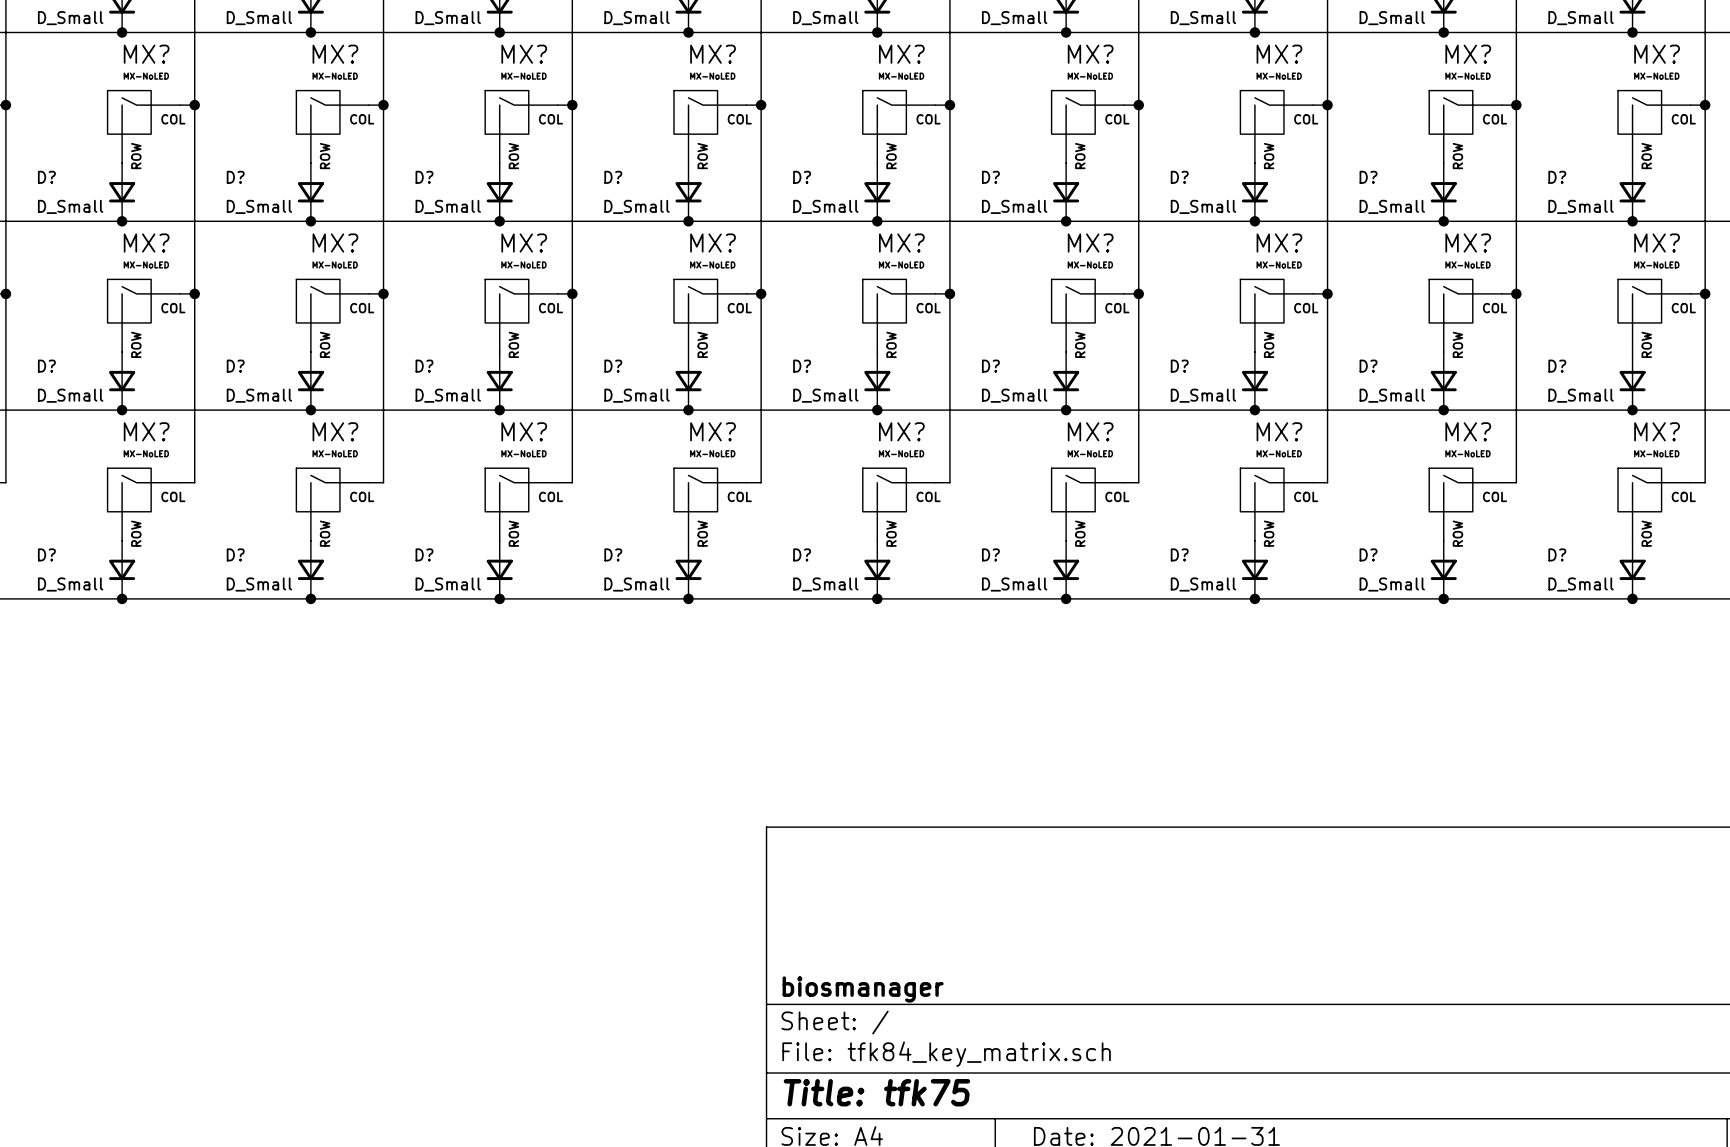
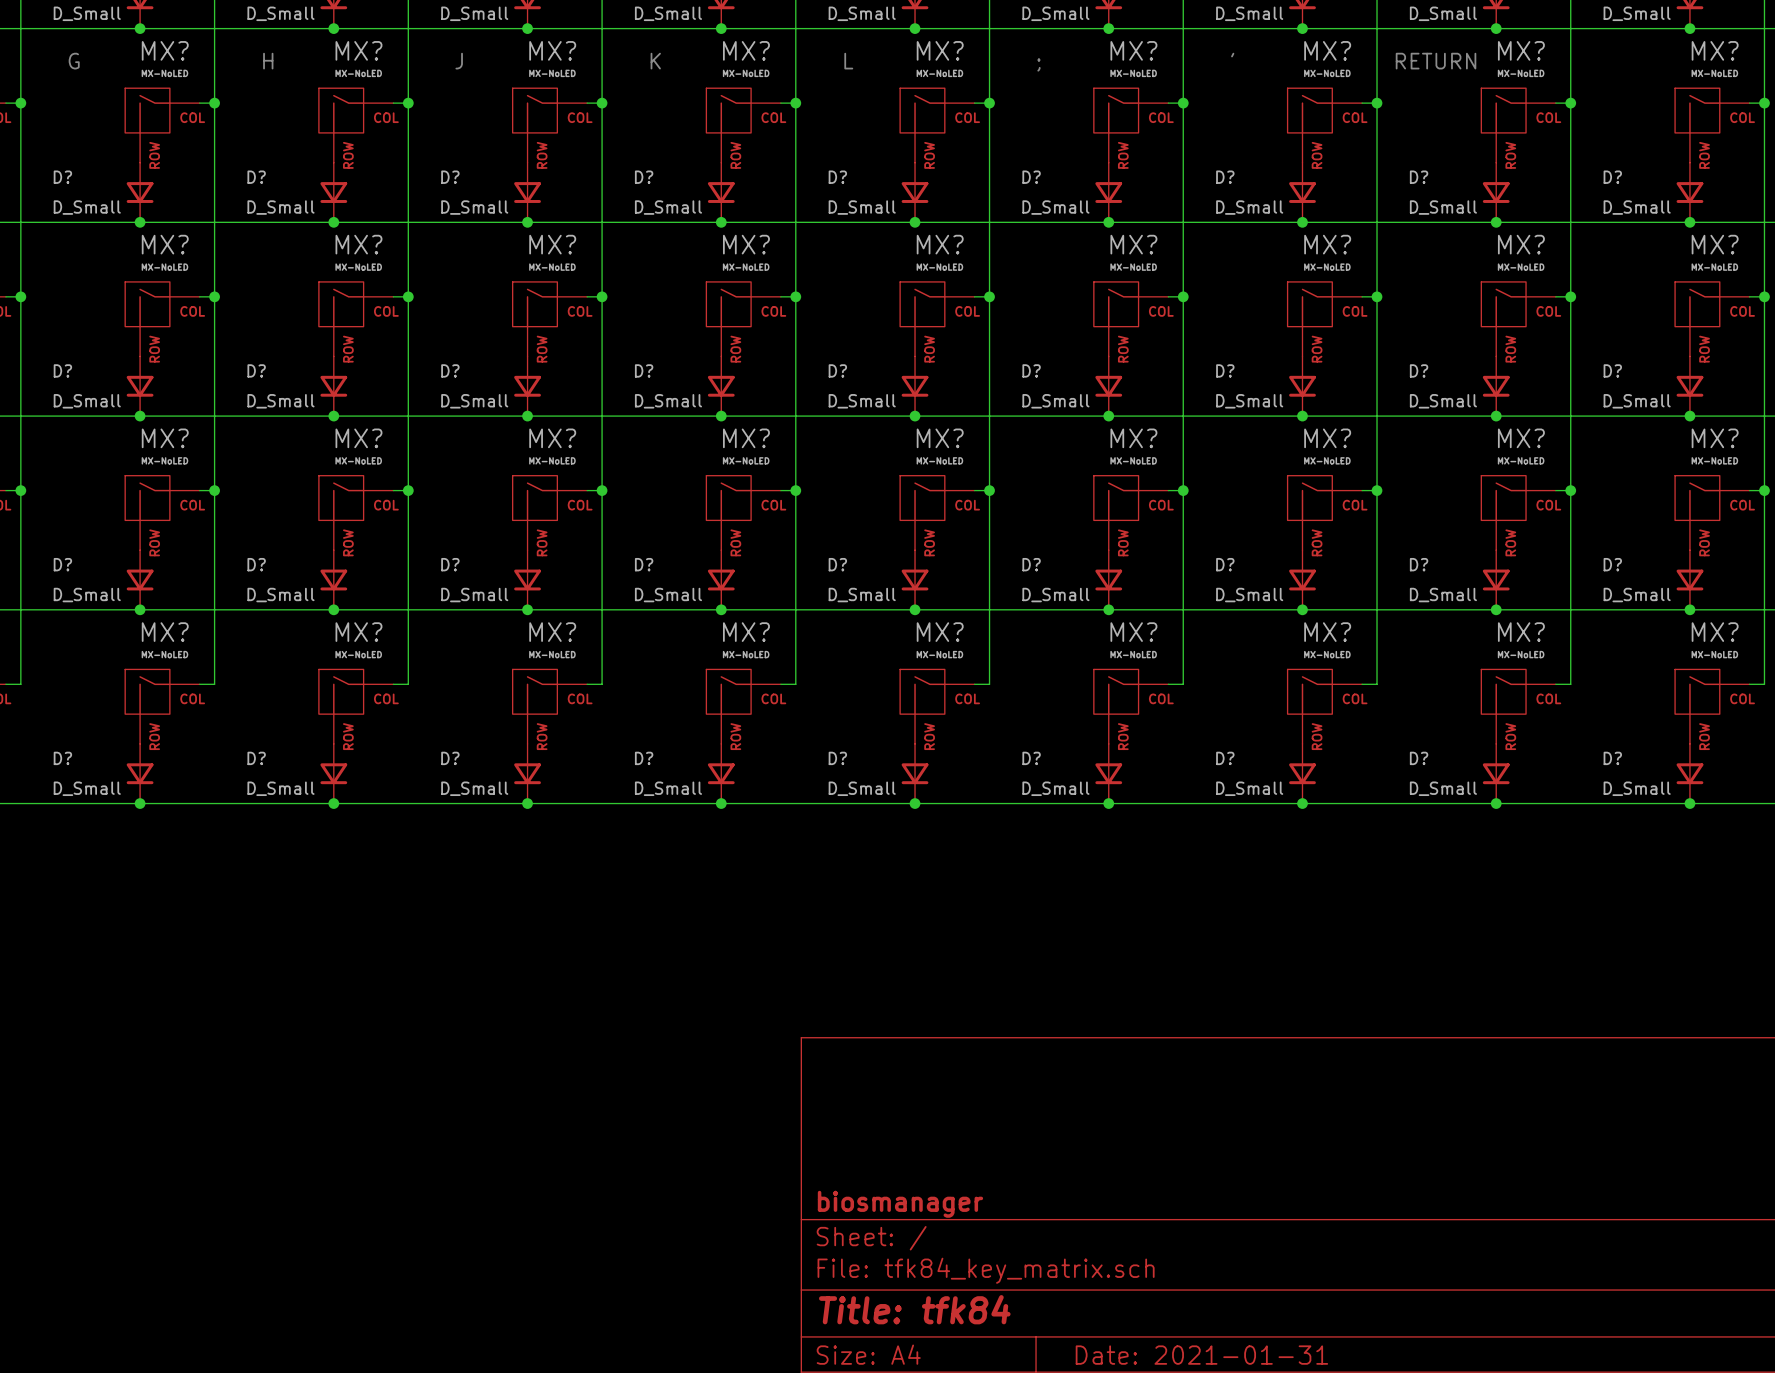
title block: Title: tfk75 (876, 1092) -> Title: tfk84 (914, 1309)

